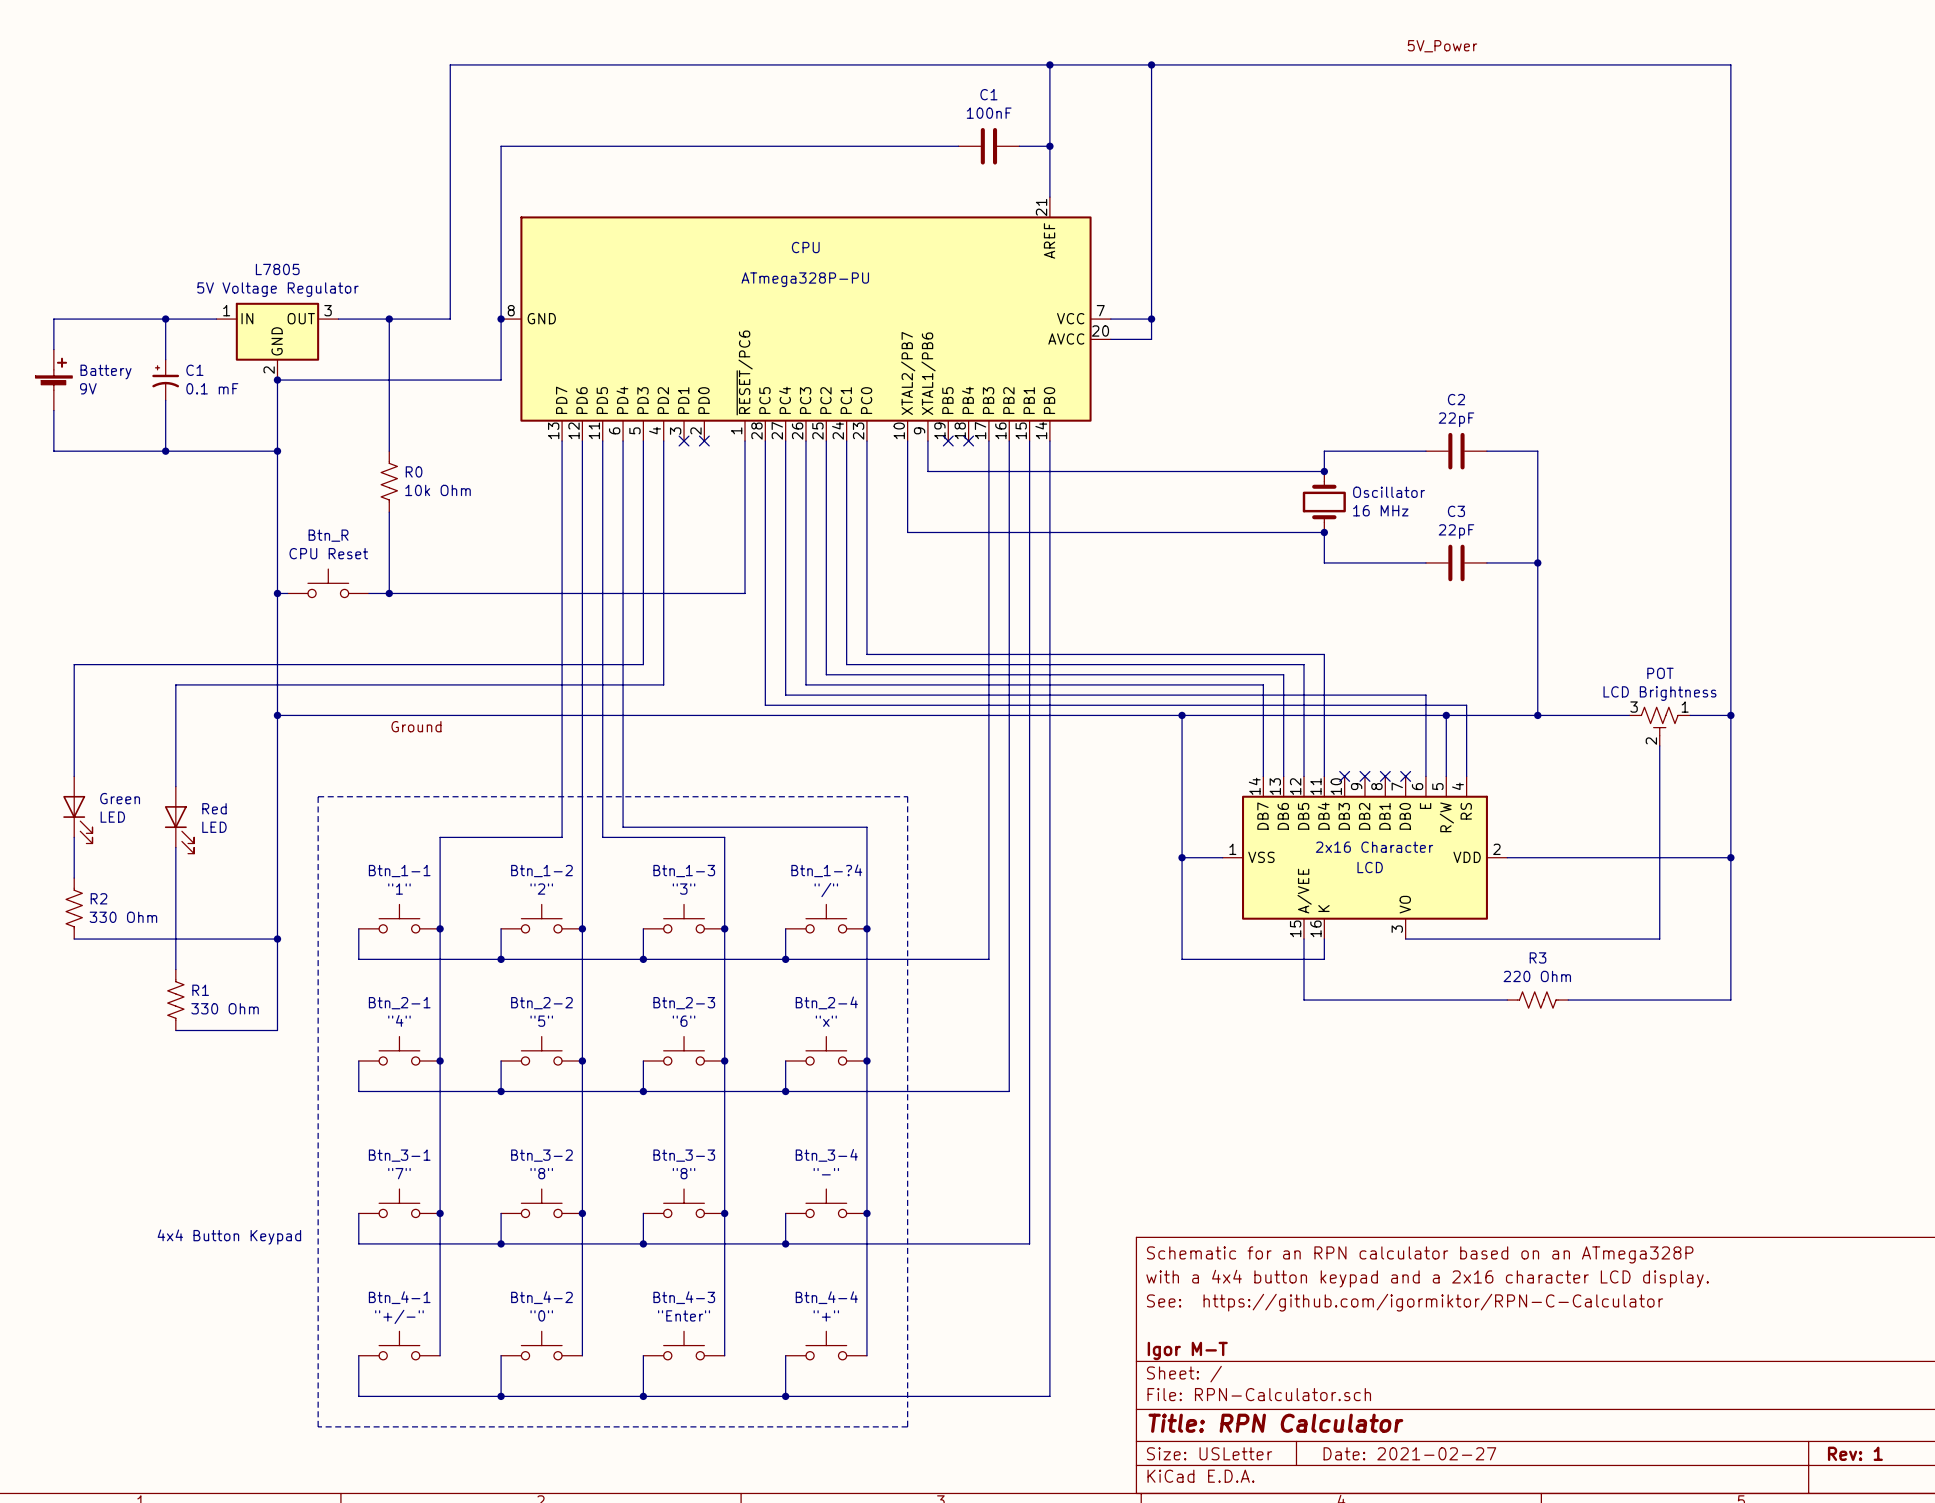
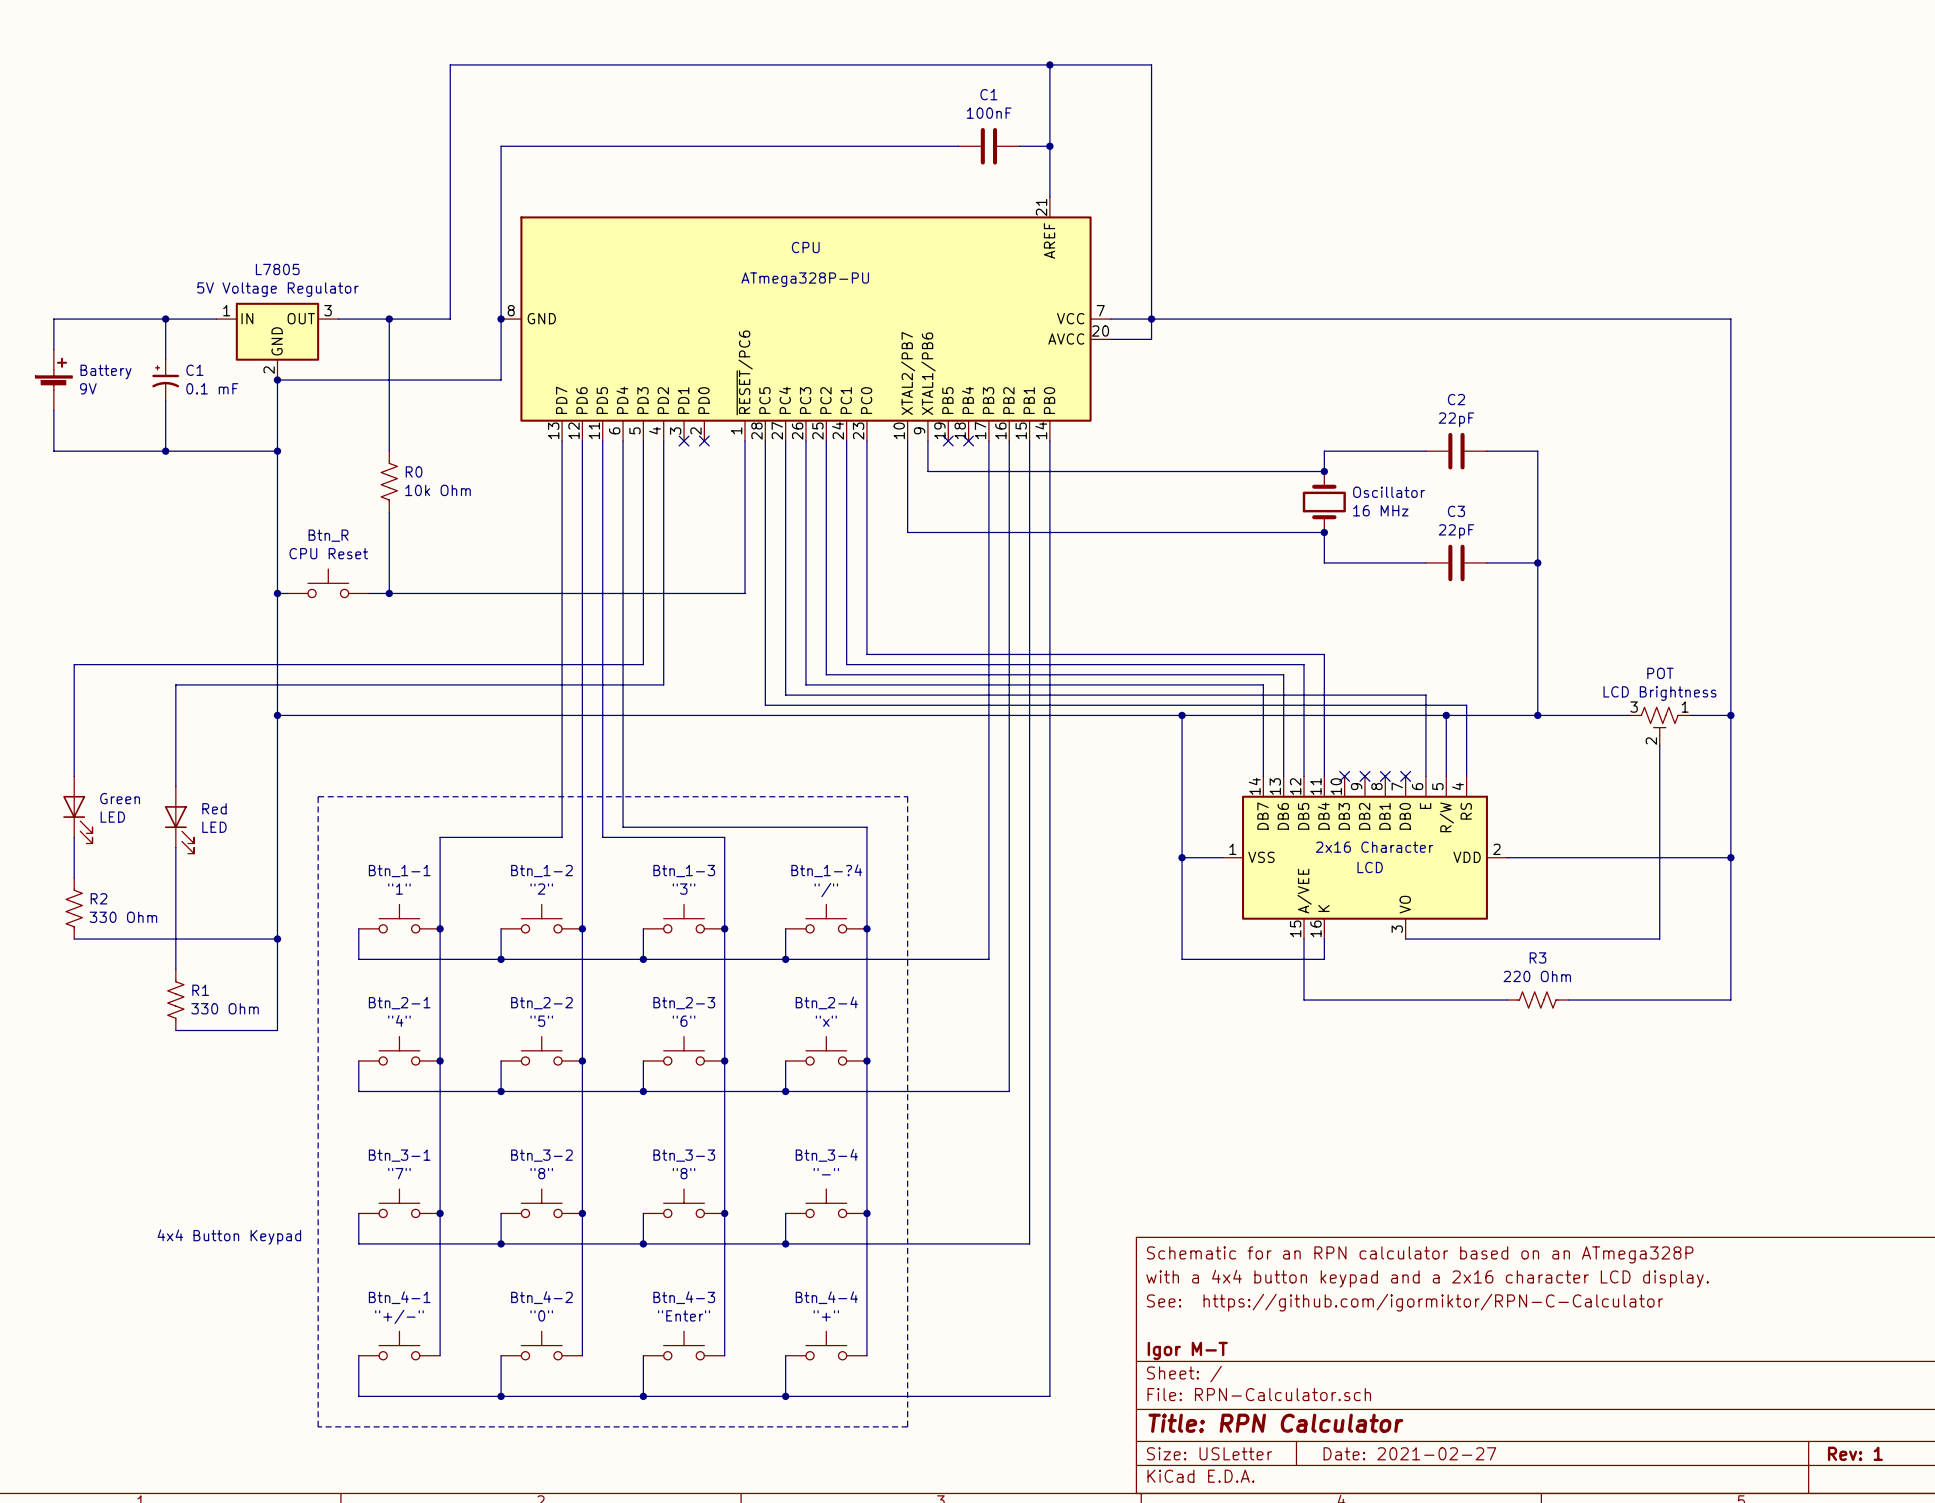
label: 5V_Power (1442, 46) -> none
wire: (1151, 64) (1730, 64) (1730, 319) -> (1151, 319) (1730, 319)
junction: (1151, 64) -> none
label: Ground (416, 726) -> none

